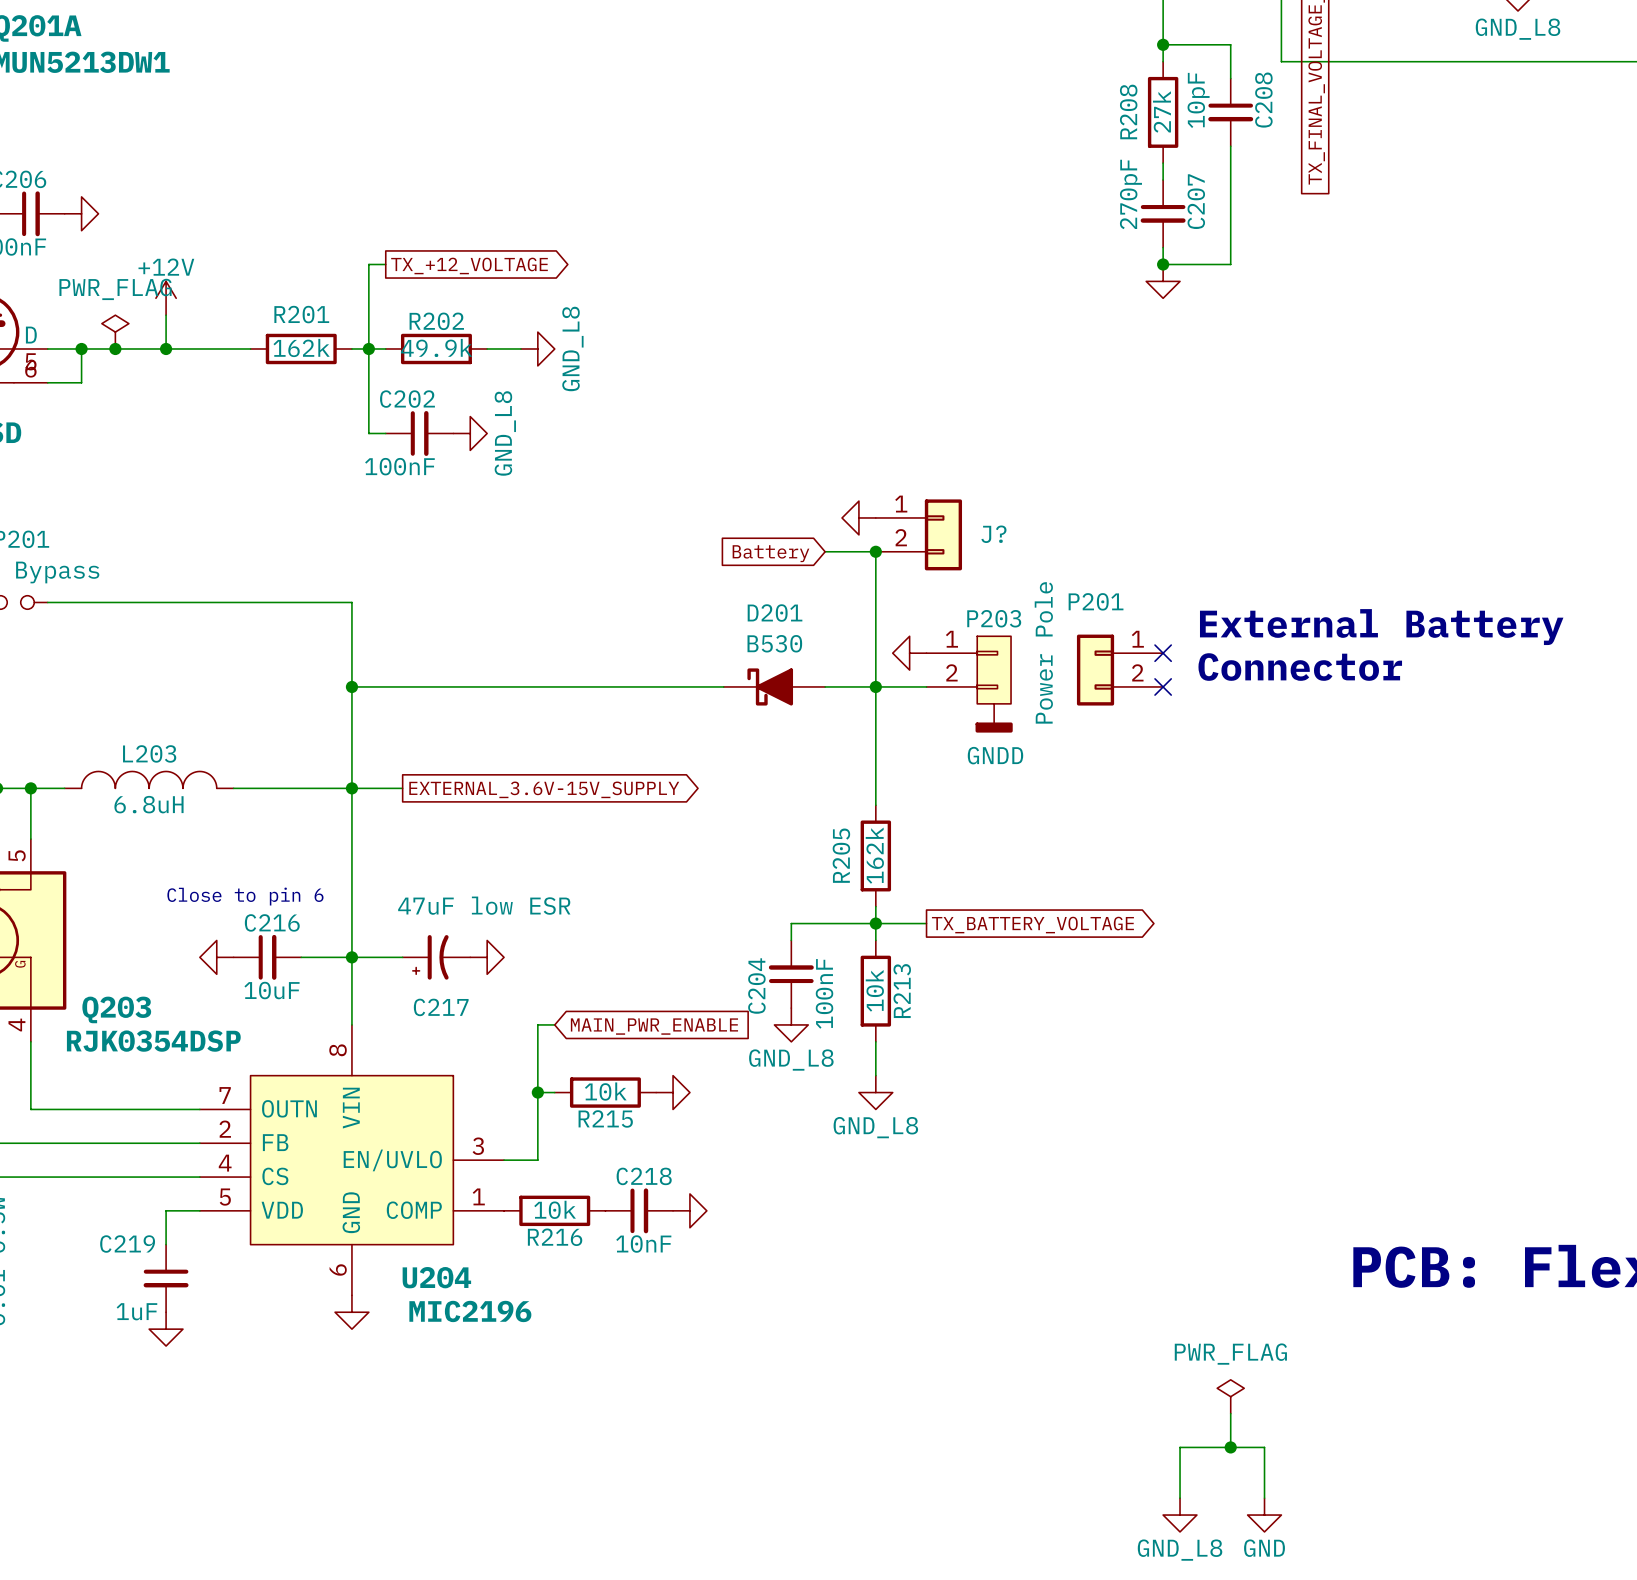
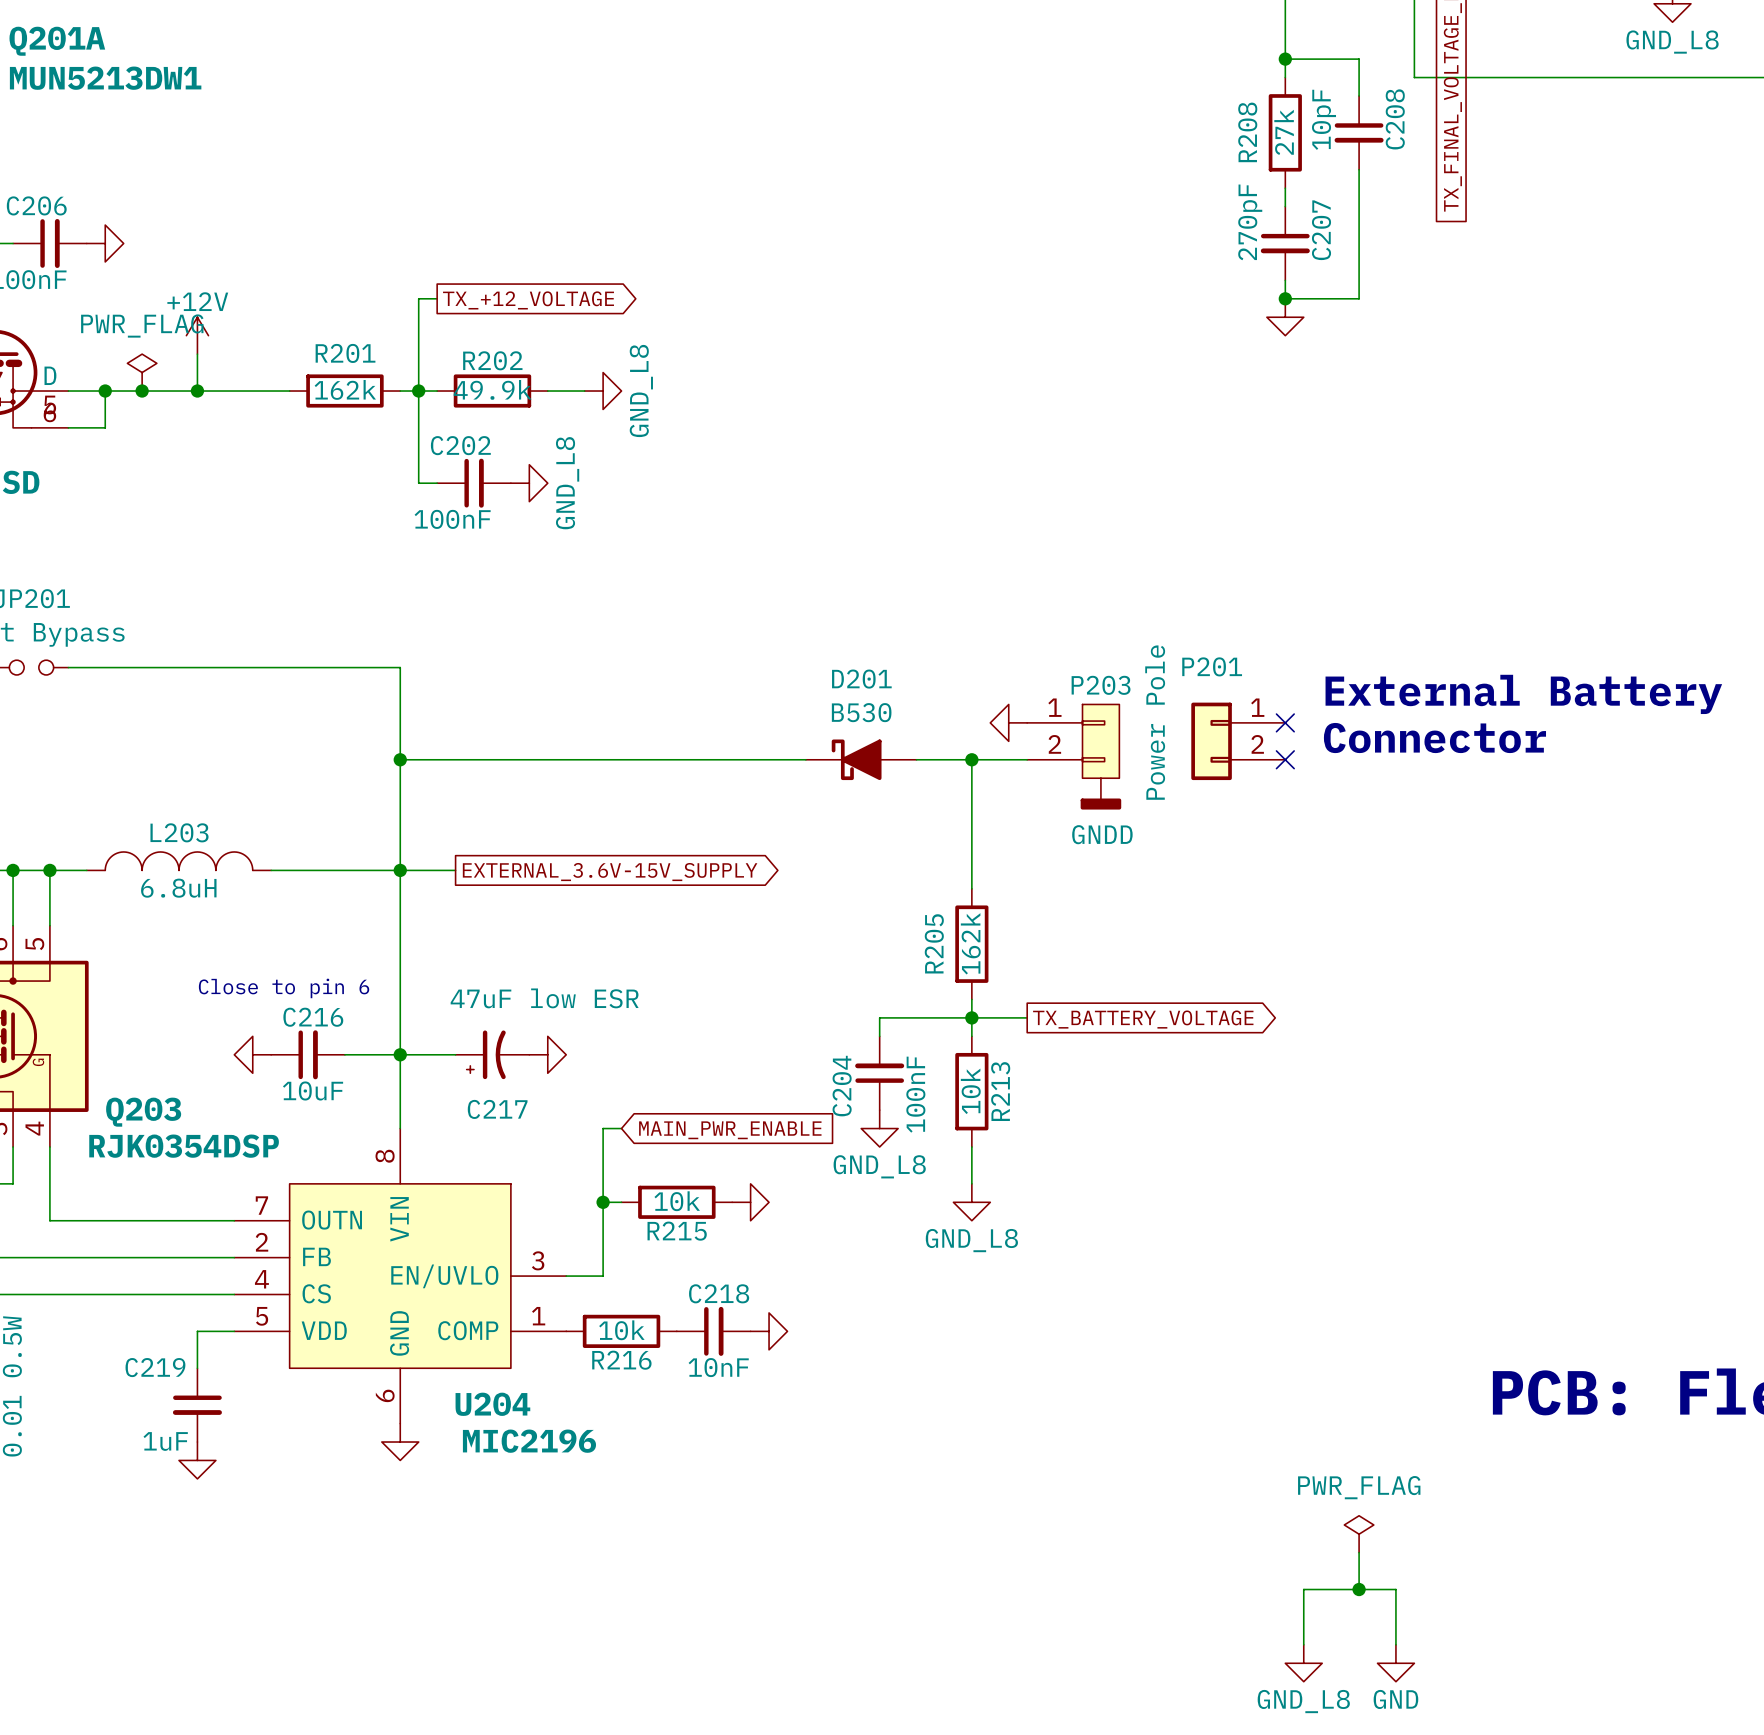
power symbol: (858, 517) -> none
J?: (918, 534) -> none
wire: (825, 551) (875, 551) (875, 686) -> none
junction: (875, 551) -> none
global label: Battery (770, 553) -> none

